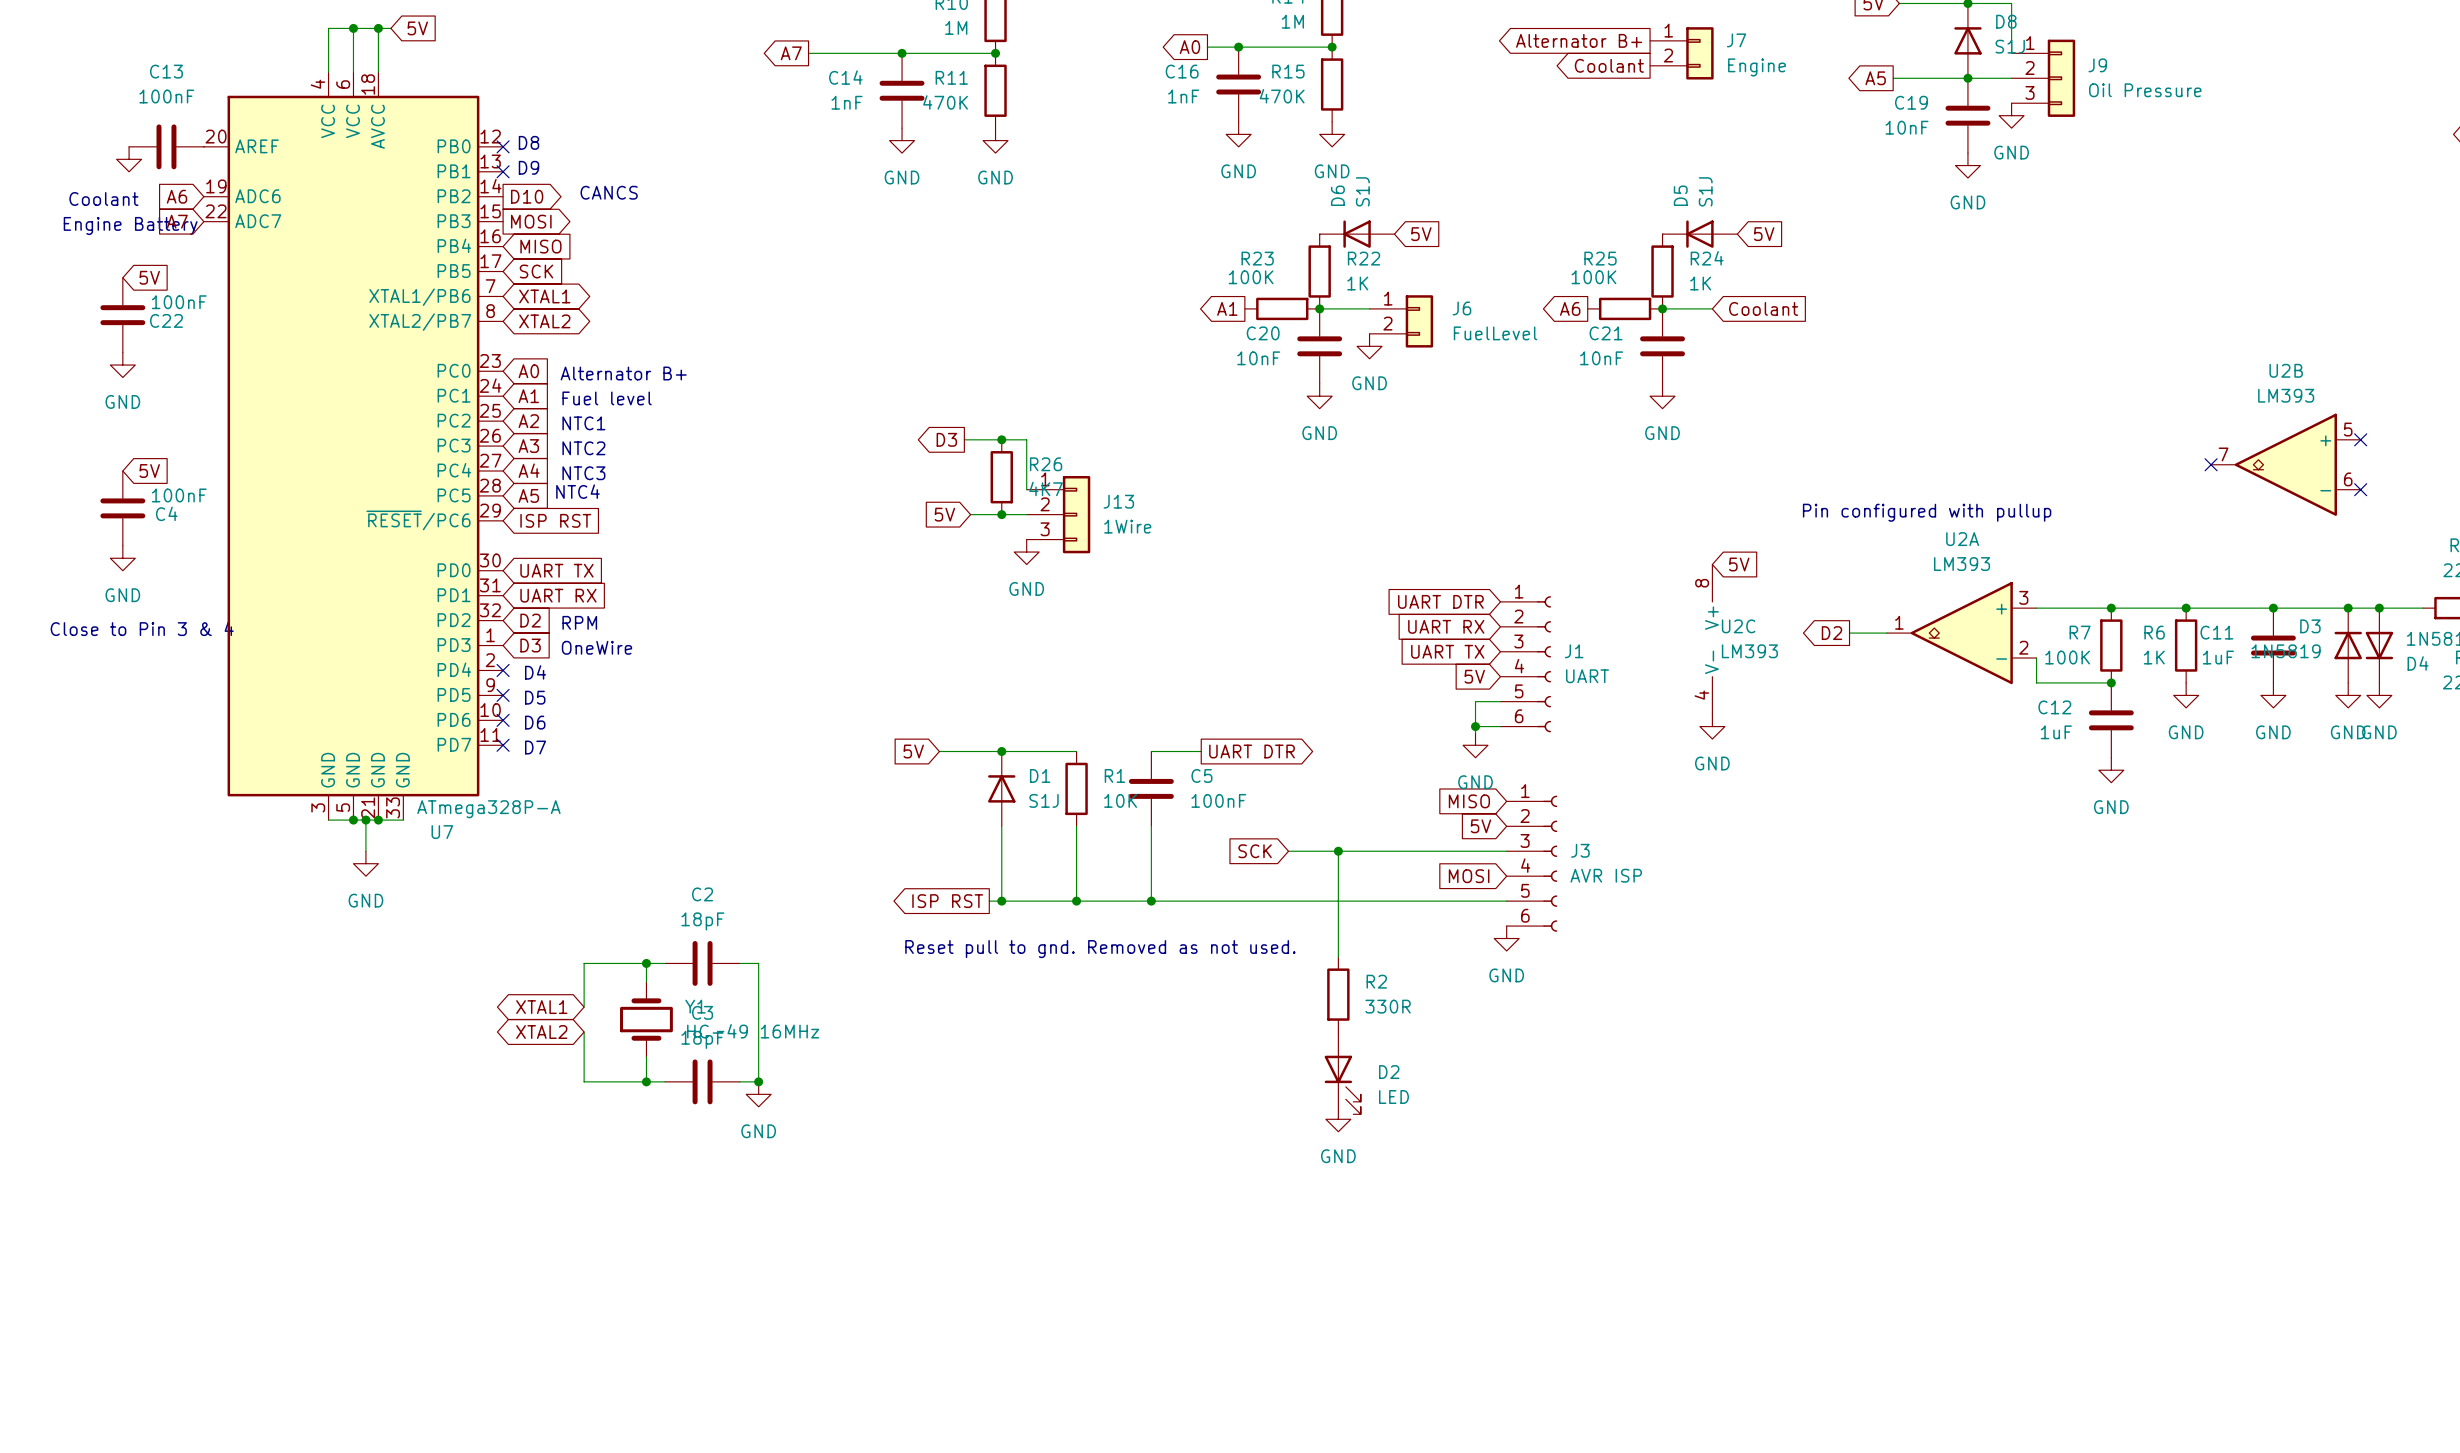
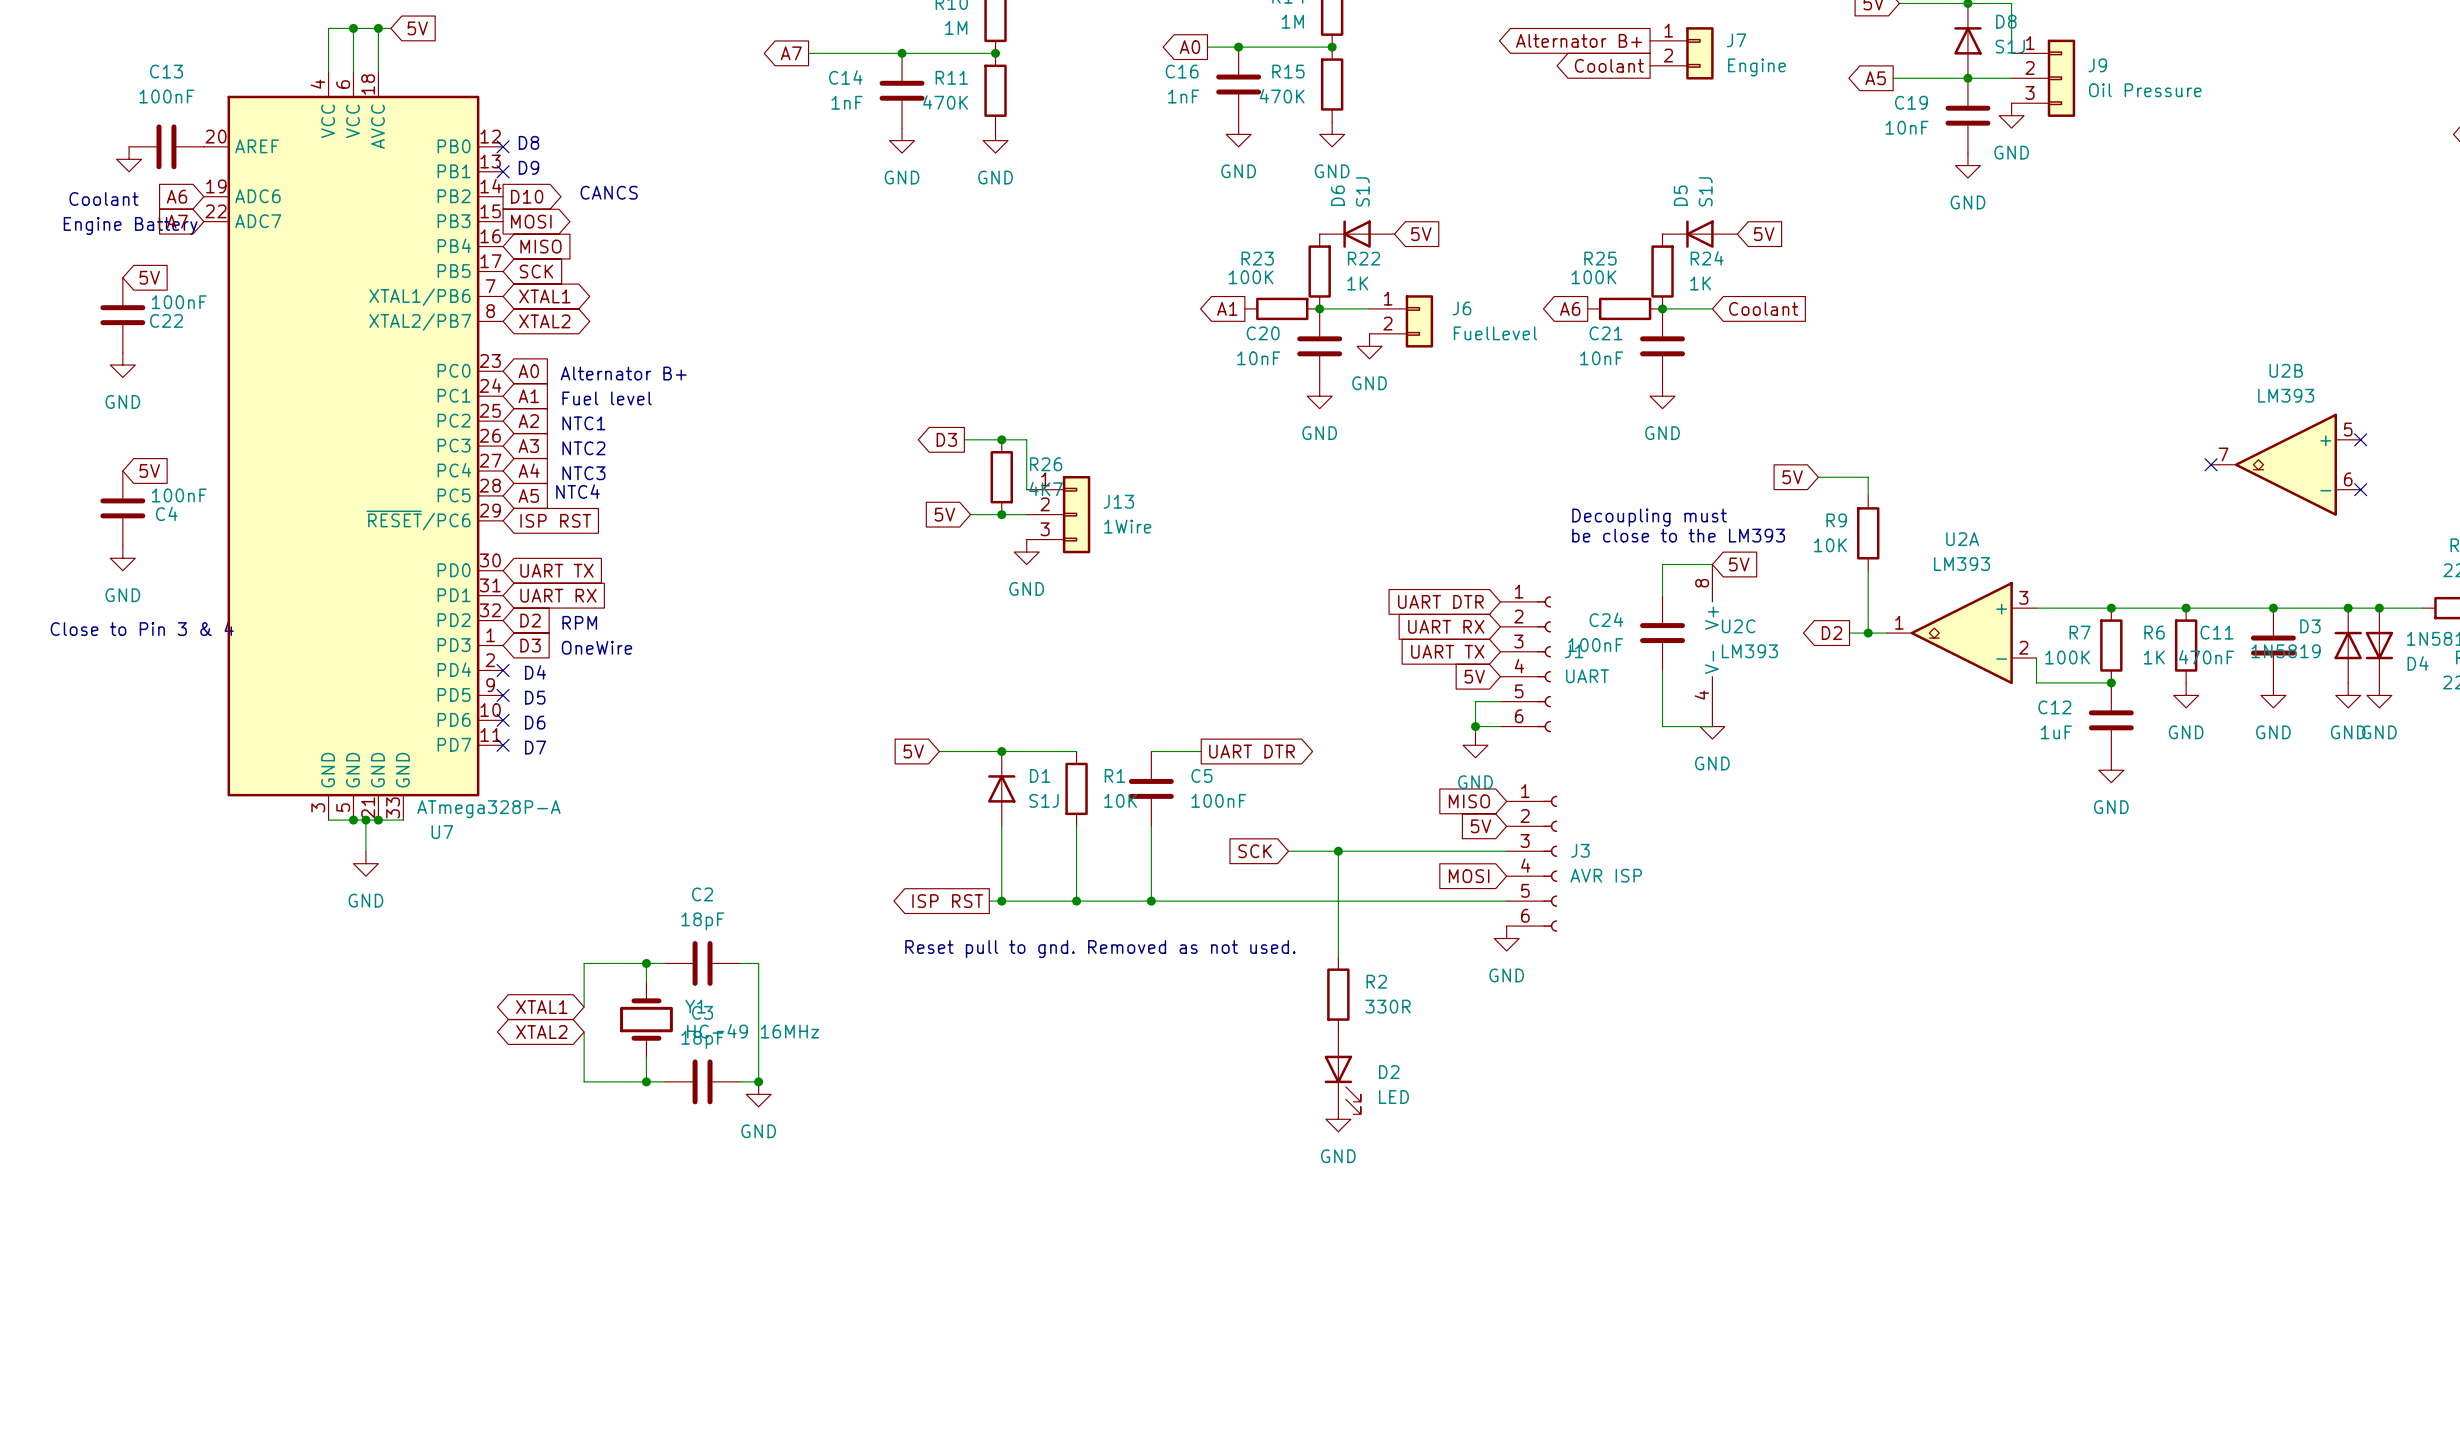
global label: none -> 5V (1792, 477)
wire: none -> (1818, 477) (1868, 477) (1868, 495)
text: Pin configured with pullup (1927, 512) -> none
text: none -> Decoupling must (1649, 517)
R9: none -> 10K (1868, 533)
text: none -> be close to the LM393 (1678, 535)
wire: none -> (1712, 564) (1662, 564) (1662, 595)
wire: none -> (1868, 570) (1868, 633)
C24: none -> 100nF (1662, 633)
junction: none -> (1868, 633)
C11 value: 1uF (2218, 657) -> 470nF (2206, 657)
wire: none -> (1662, 670) (1662, 726) (1712, 726)

